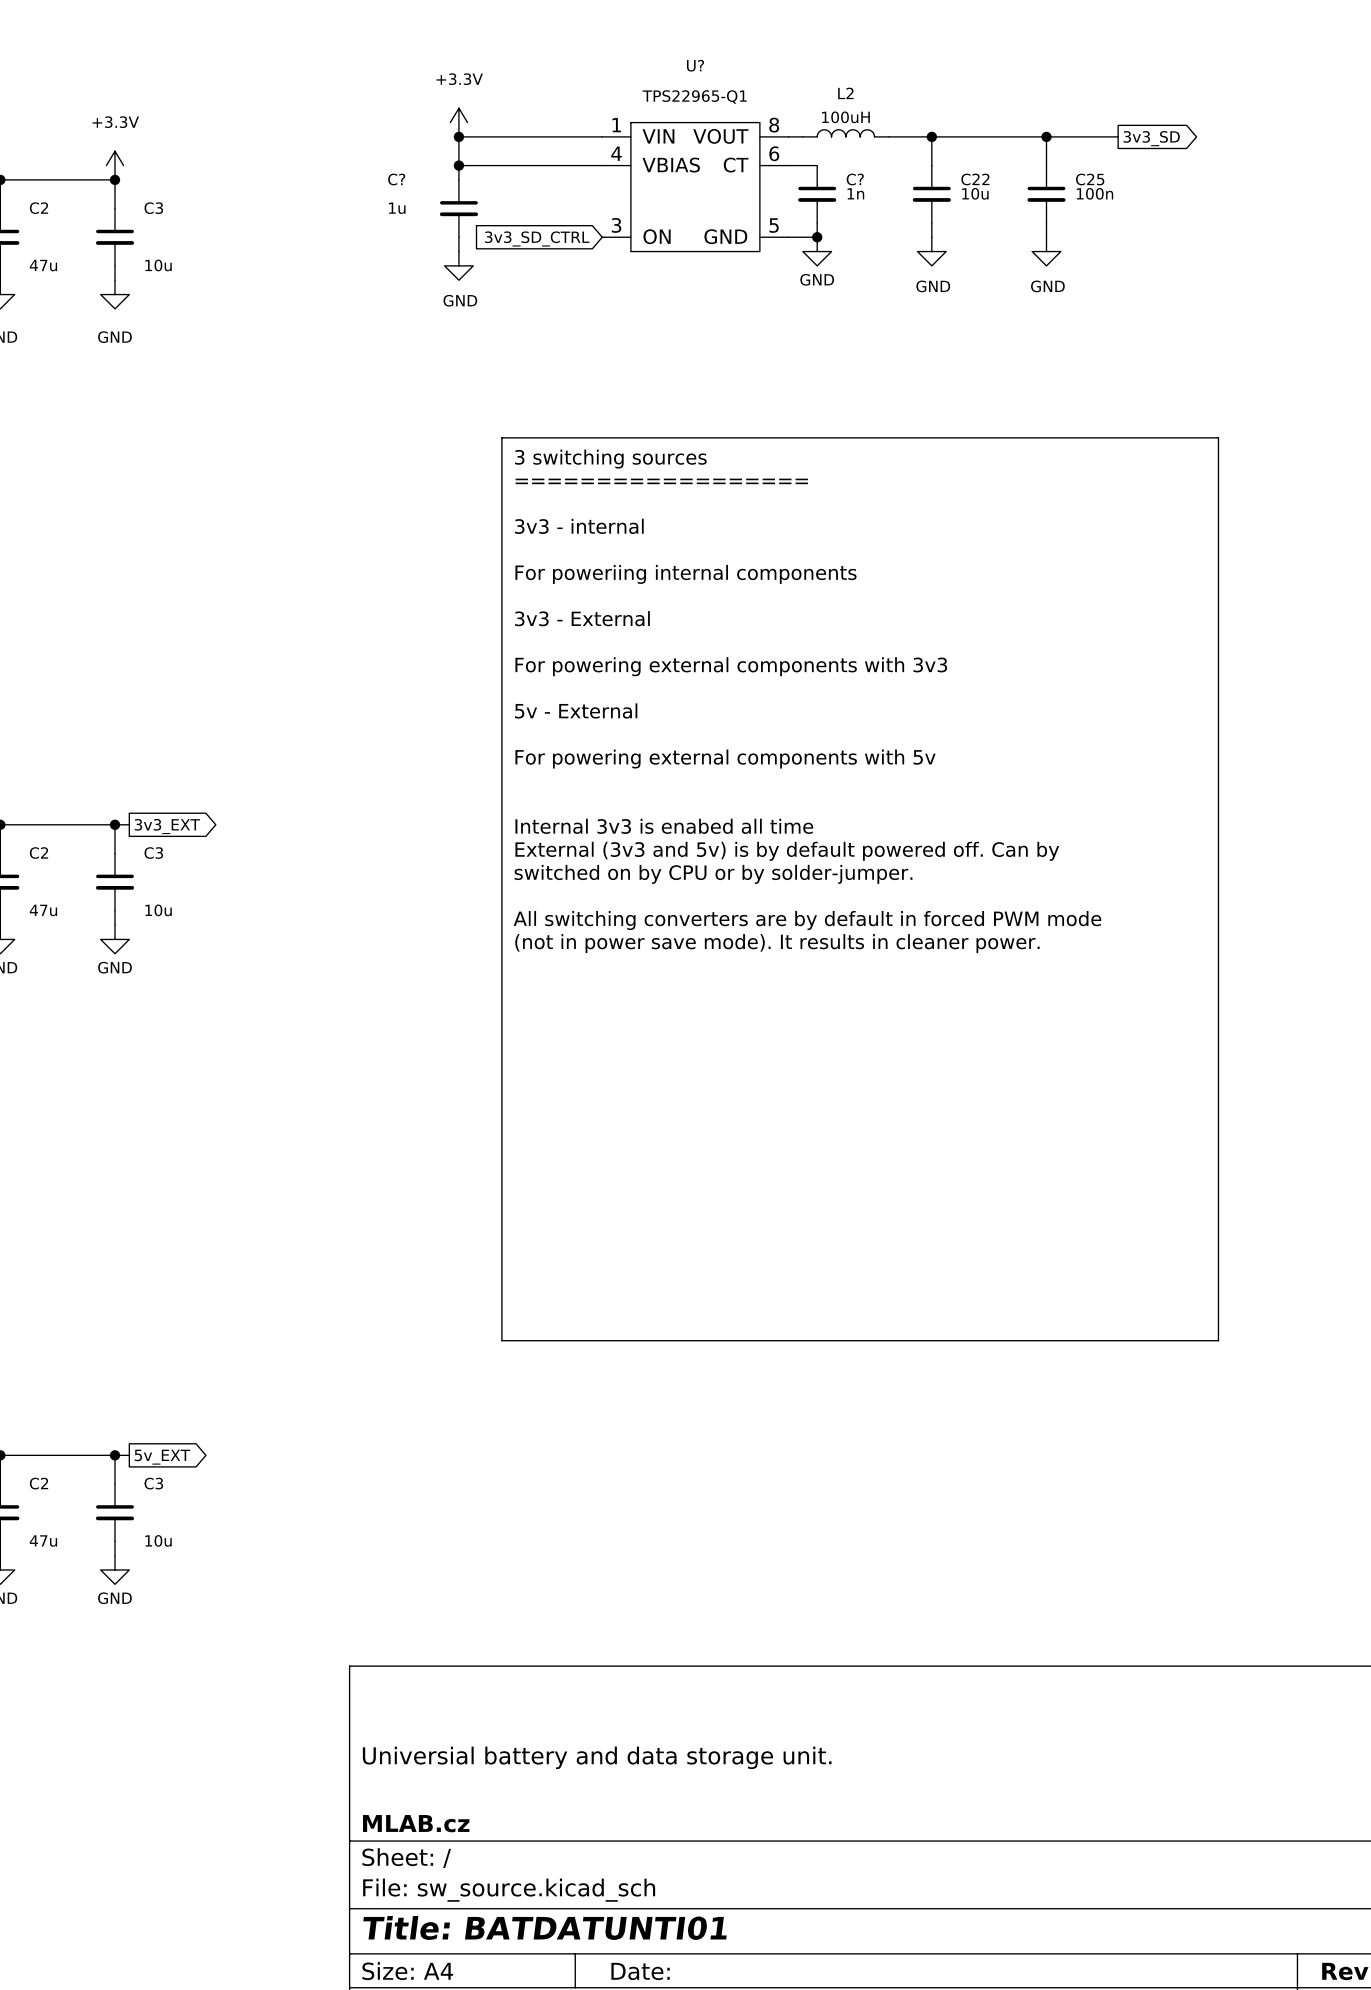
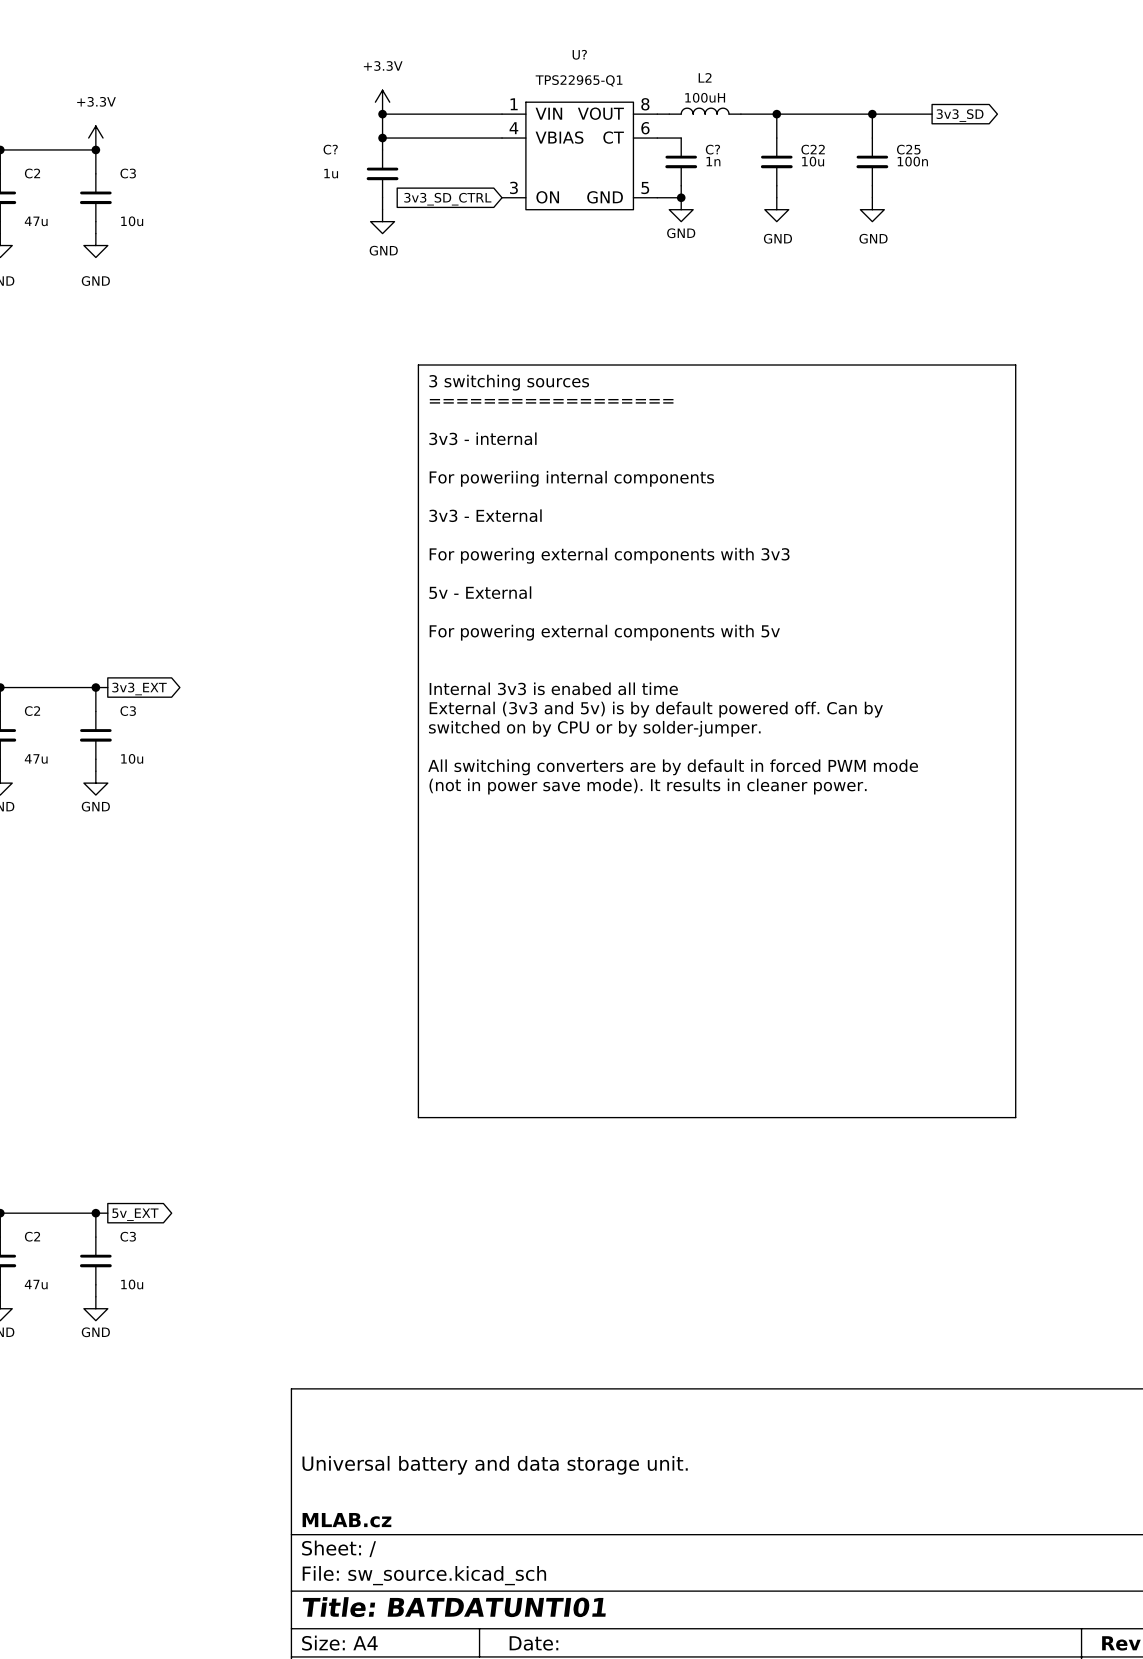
title block: Universial battery and data storage unit. (597, 1757) -> Universal battery and data storage unit. (495, 1465)

